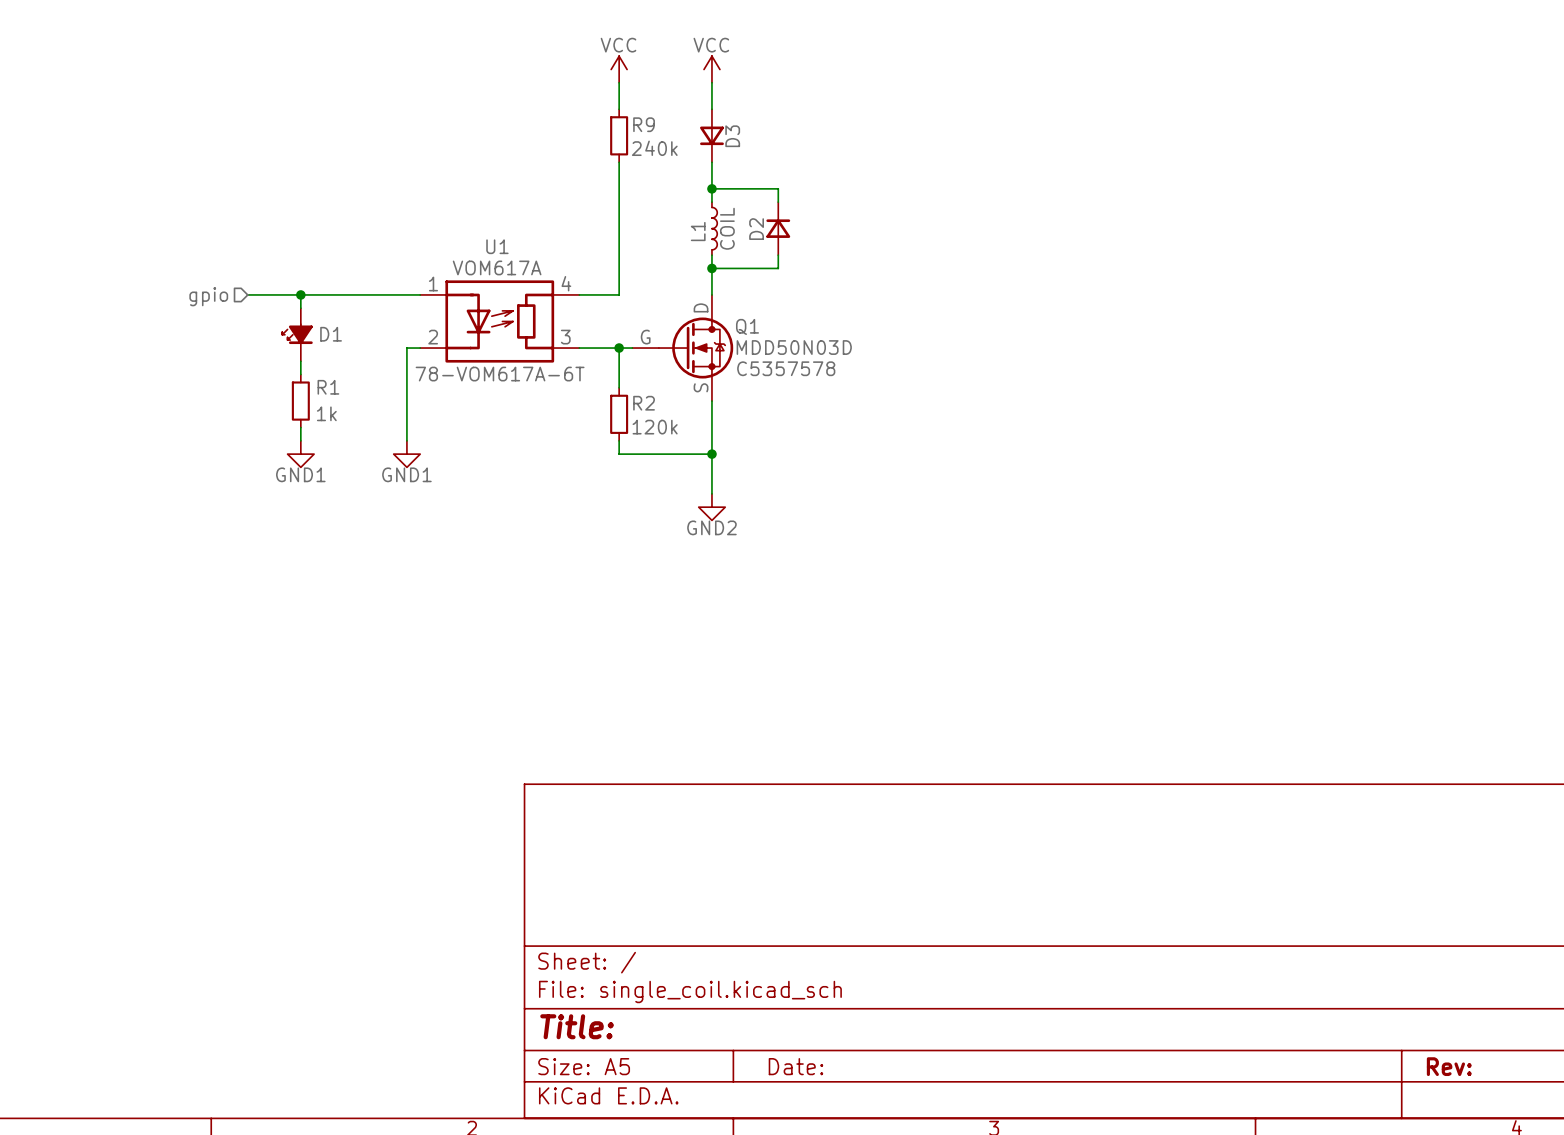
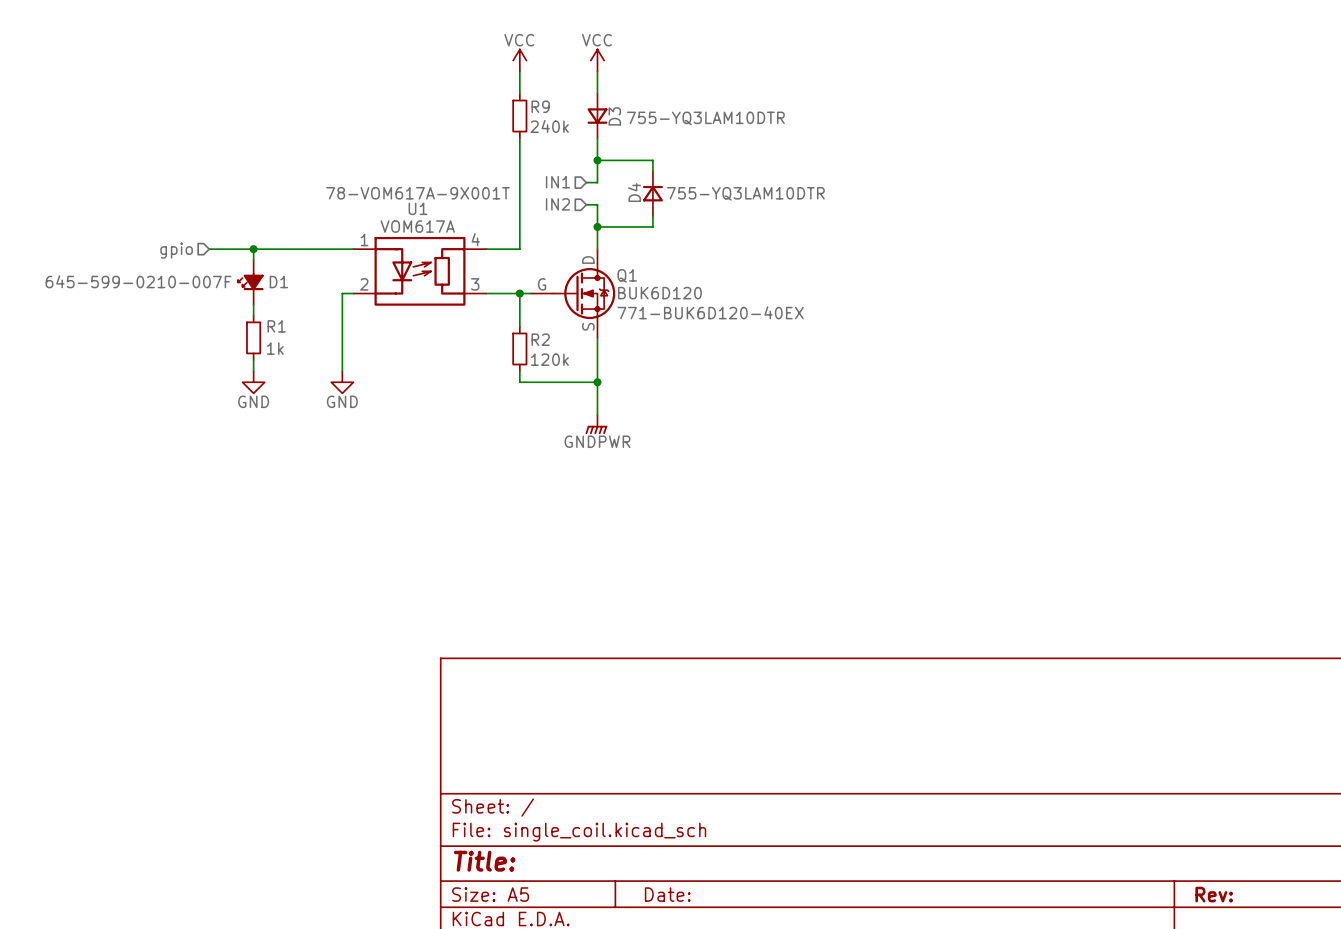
D3 text: none -> 755-YQ3LAM10DTR (705, 118)
wire: none -> (597, 171) (597, 182) (586, 182)
hierarchical label: none -> IN1 (557, 182)
L1: COIL (714, 228) -> none
D2 text: none -> 755-YQ3LAM10DTR (745, 193)
D2 name: D2 (756, 229) -> D4 (634, 192)
hierarchical label: none -> IN2 (557, 204)
wire: none -> (586, 204) (597, 204) (597, 215)
D1 text: none -> 645-599-0210-007F (138, 281)
Q1 value: MDD50N03D (794, 347) -> BUK6D120 (659, 293)
Q1 text: C5357578 (786, 368) -> none
Q1 text: none -> 771-BUK6D120-40EX (710, 312)
U1 text: 78-VOM617A-6T (500, 374) -> 78-VOM617A-9X001T (418, 193)
power symbol: GND1 (300, 454) -> GND (253, 382)
power symbol: GND1 (406, 454) -> GND (342, 382)
power symbol: GND2 (711, 507) -> GNDPWR (596, 424)

